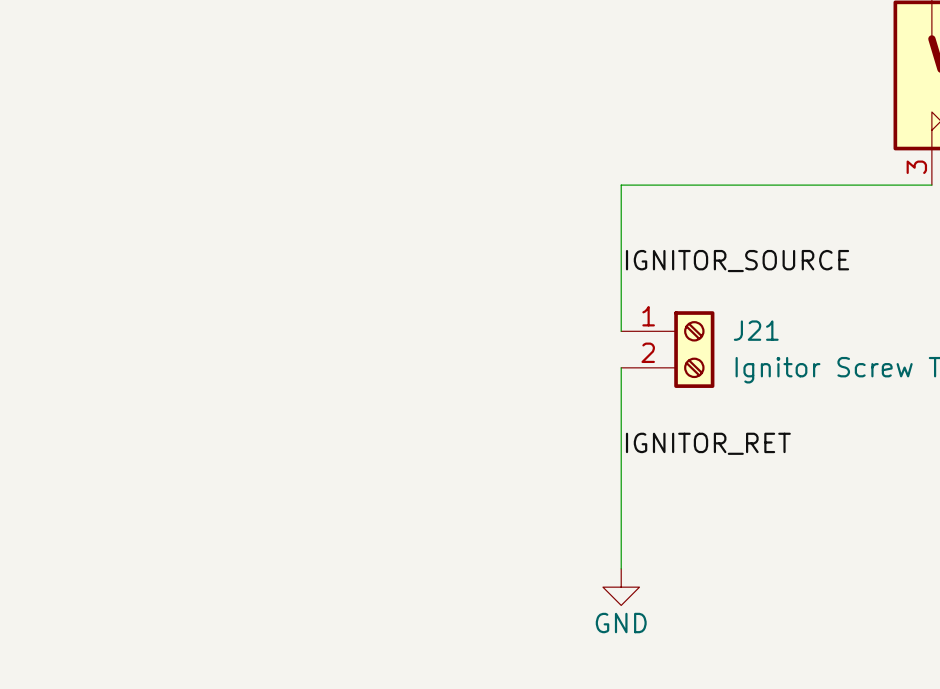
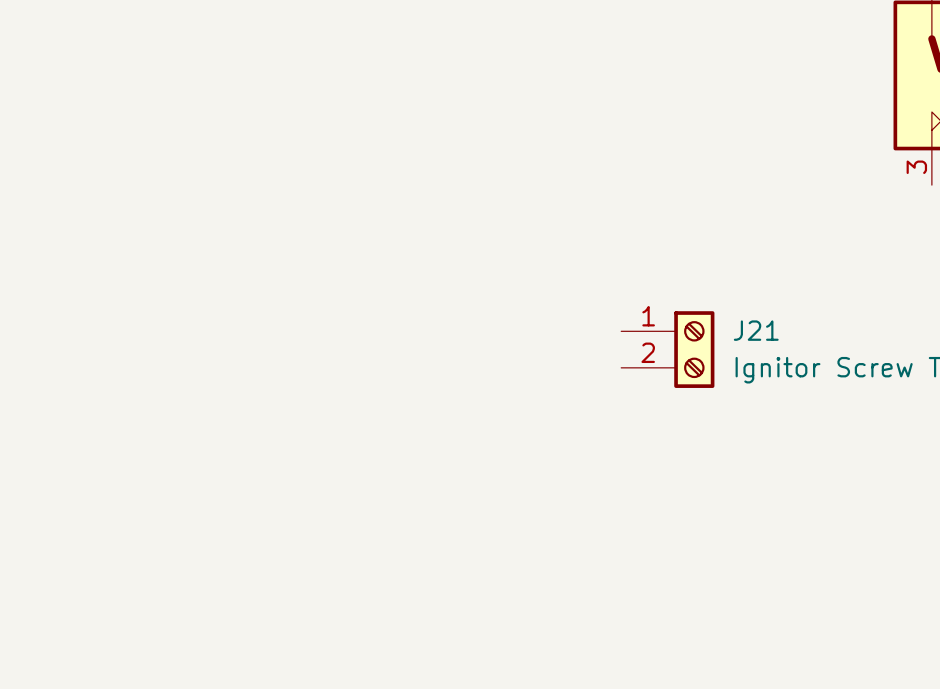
wire: (931, 185) (621, 185) (621, 331) -> none
label: IGNITOR_SOURCE (737, 261) -> none
wire: (621, 367) (621, 568) -> none
label: IGNITOR_RET (708, 443) -> none
power symbol: GND (621, 587) -> none

